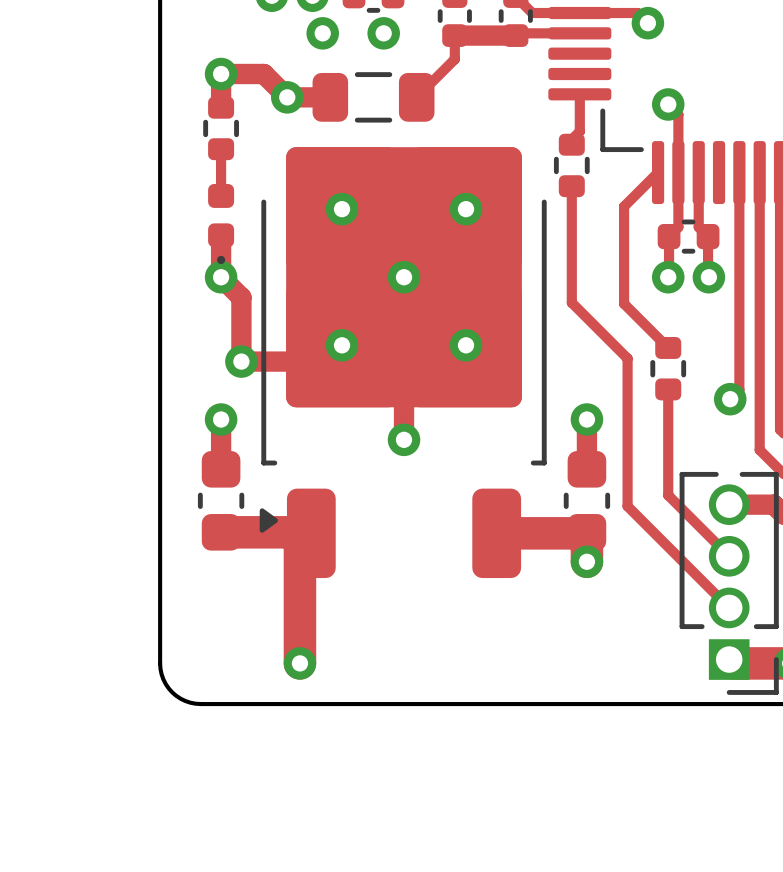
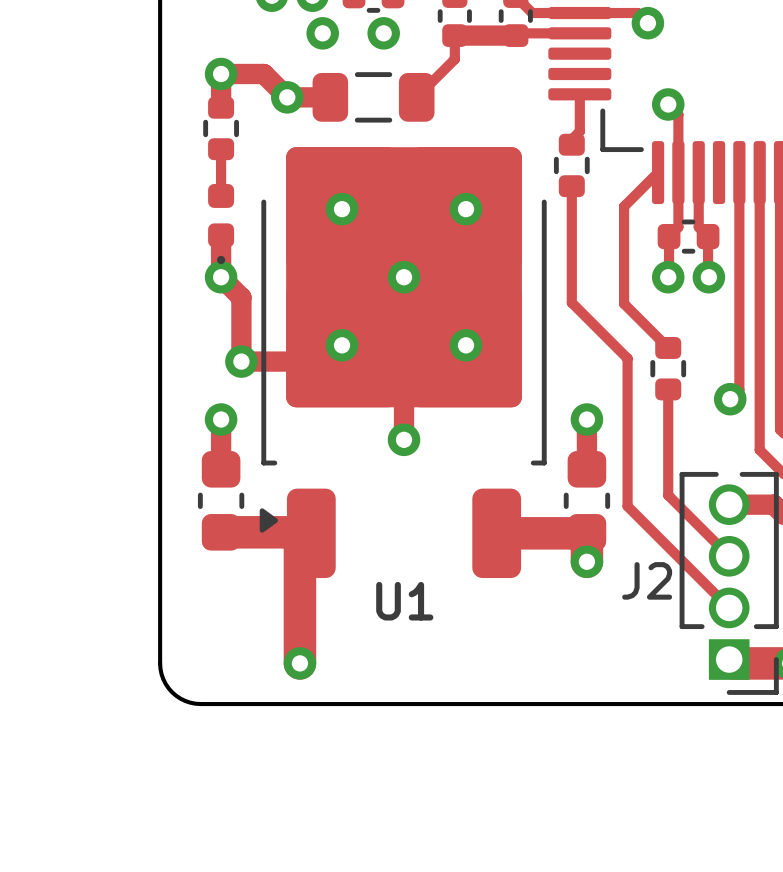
J2 name: none -> J2 (647, 580)
U1 name: none -> U1 (404, 601)

